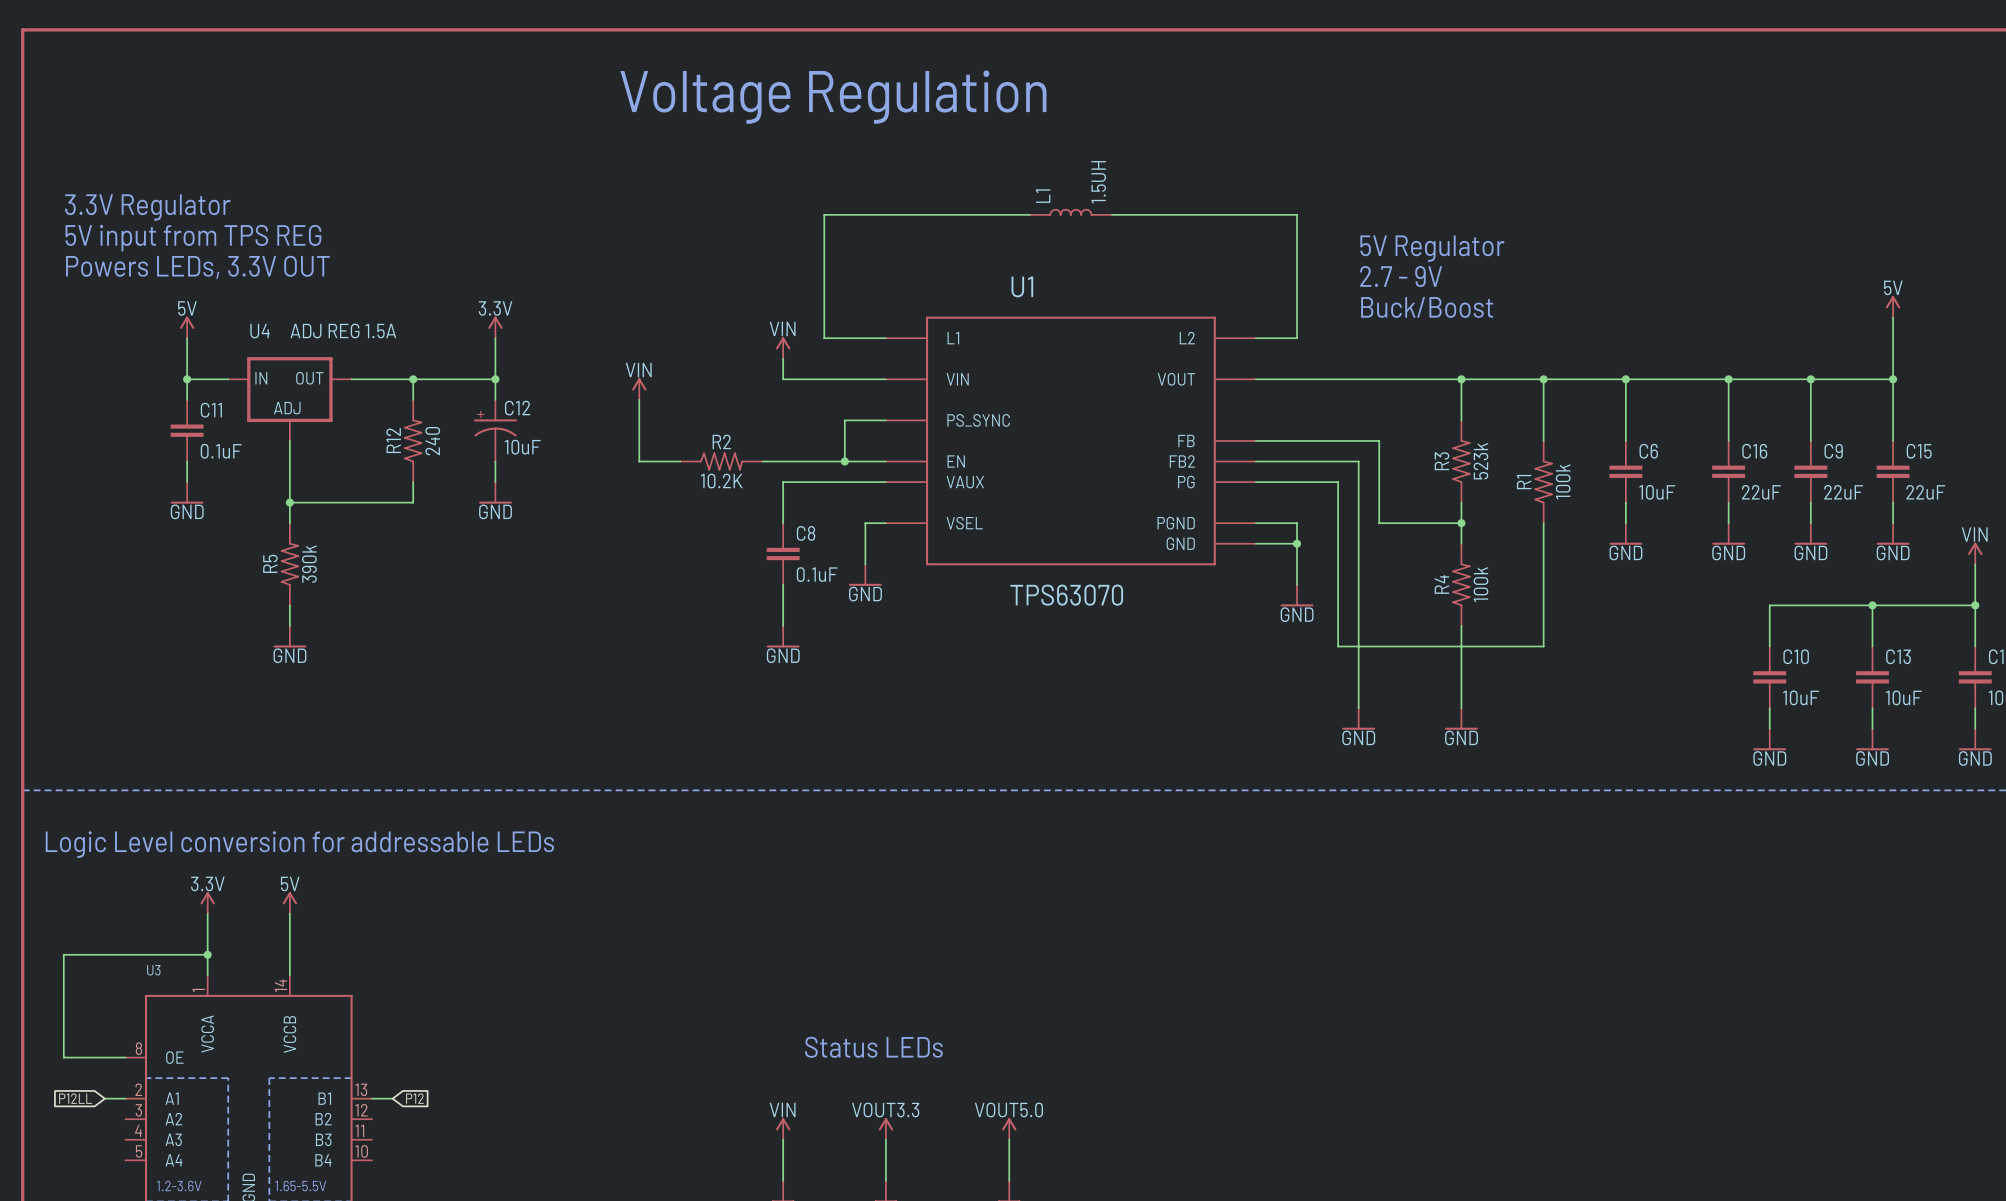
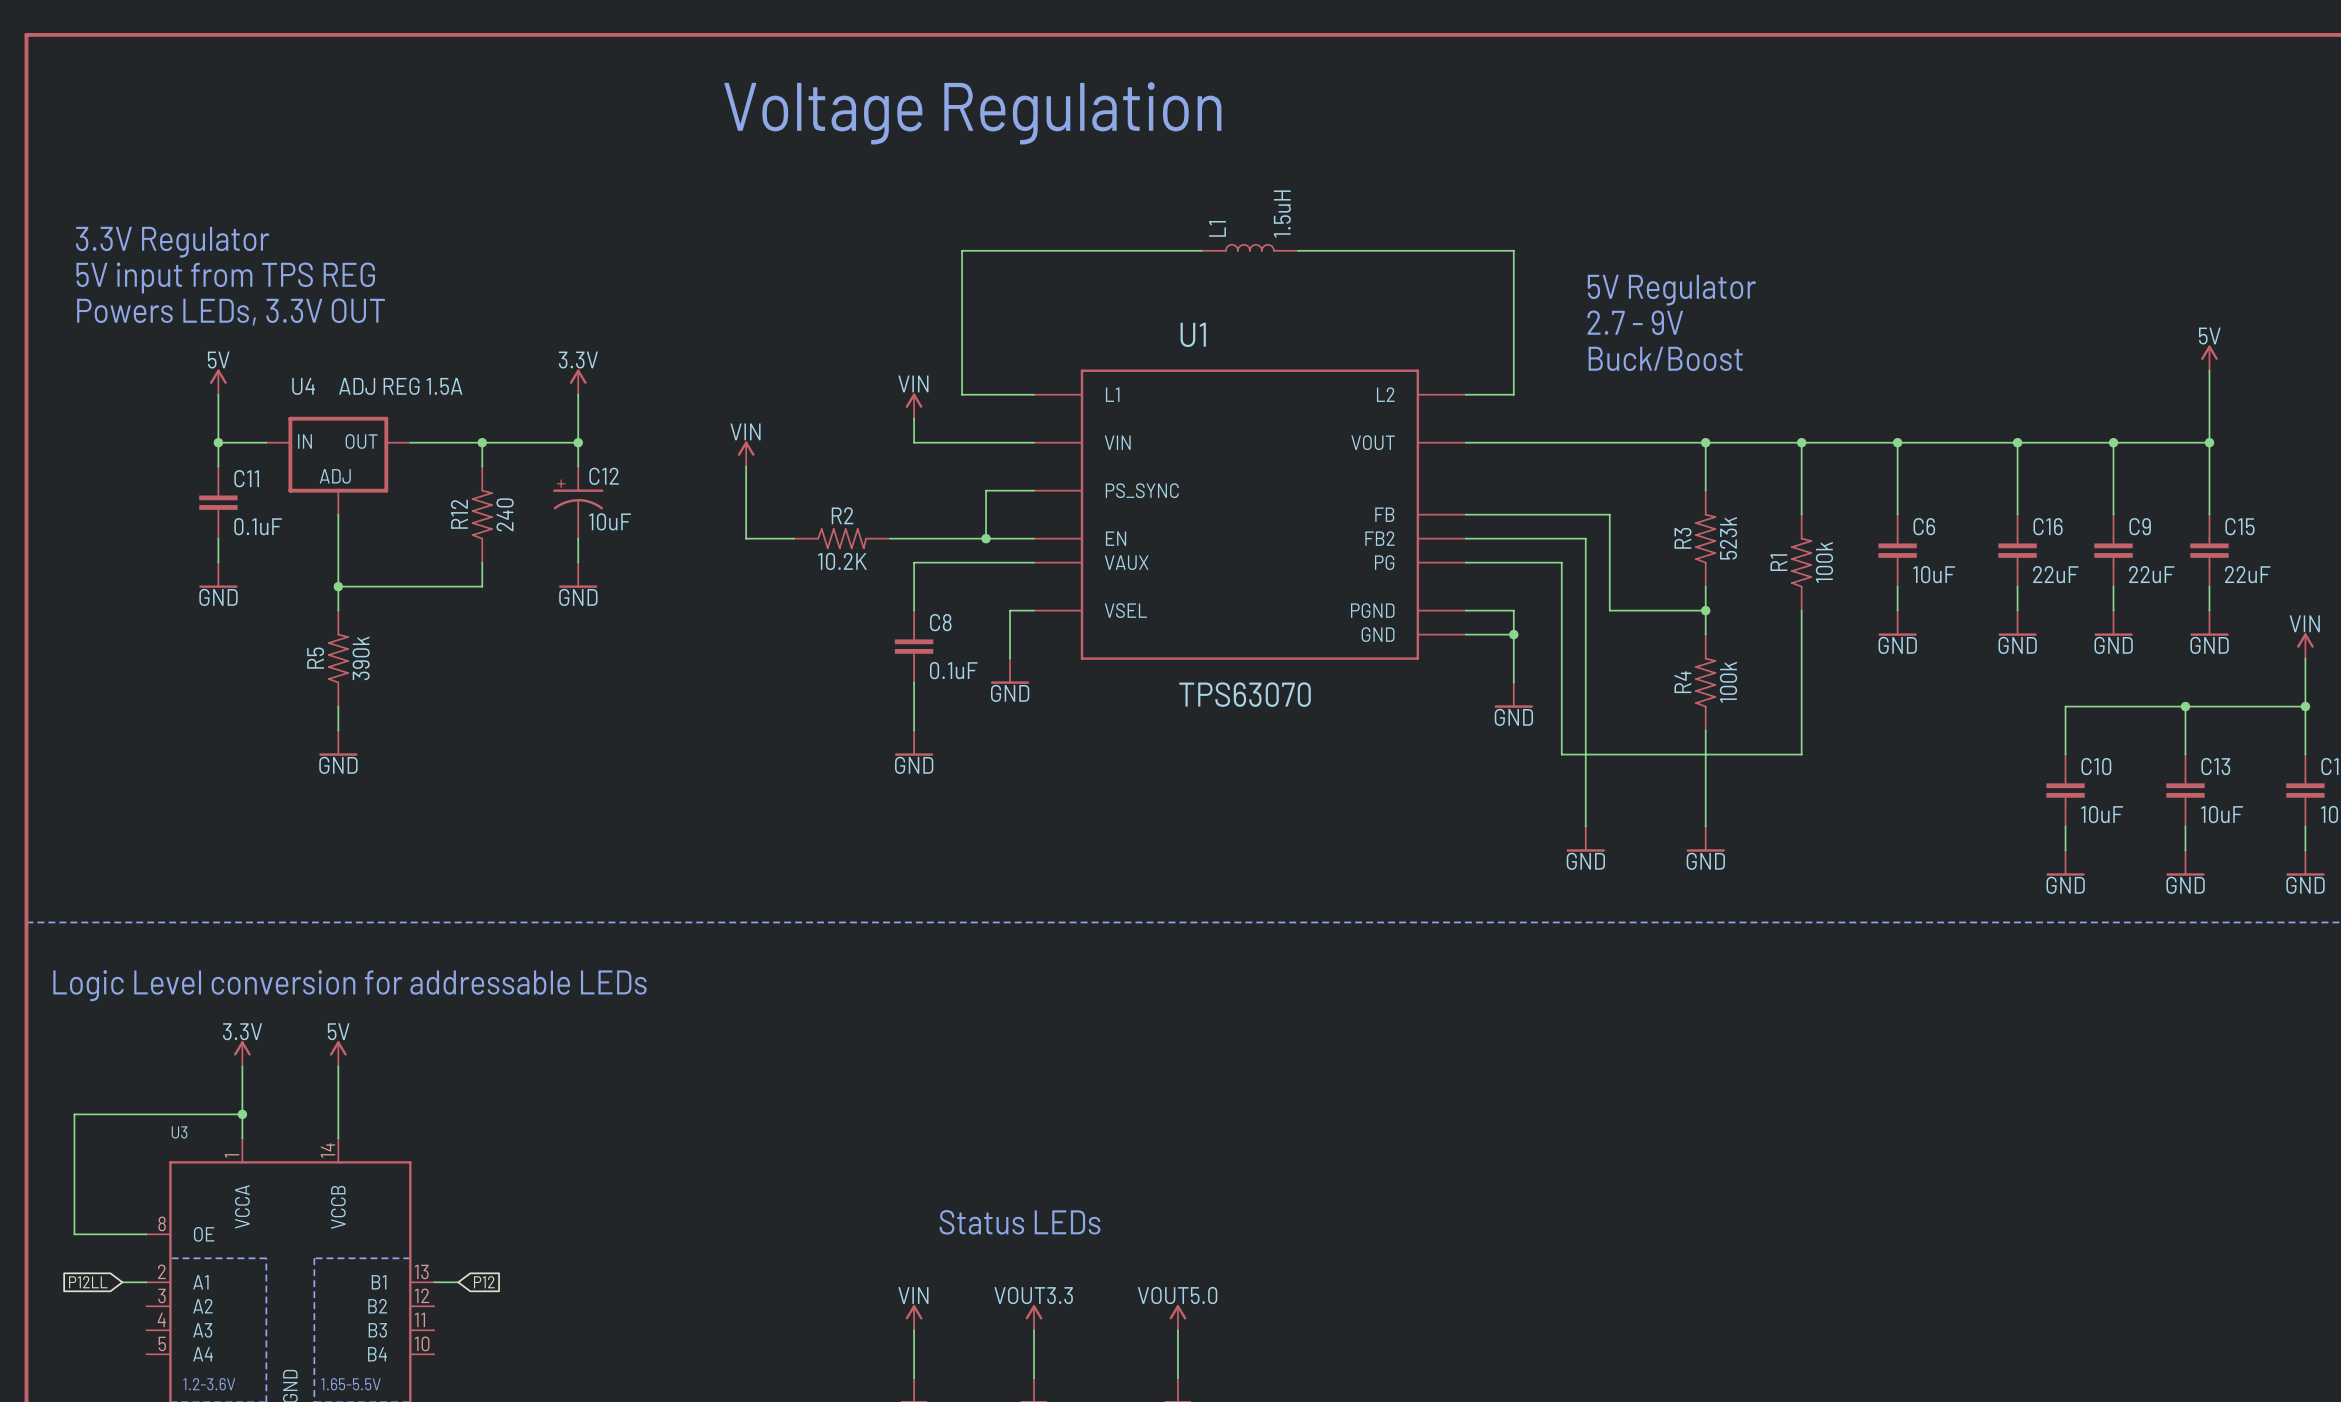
L1 value: 1.5UH (1098, 182) -> 1.5uH (1282, 213)

